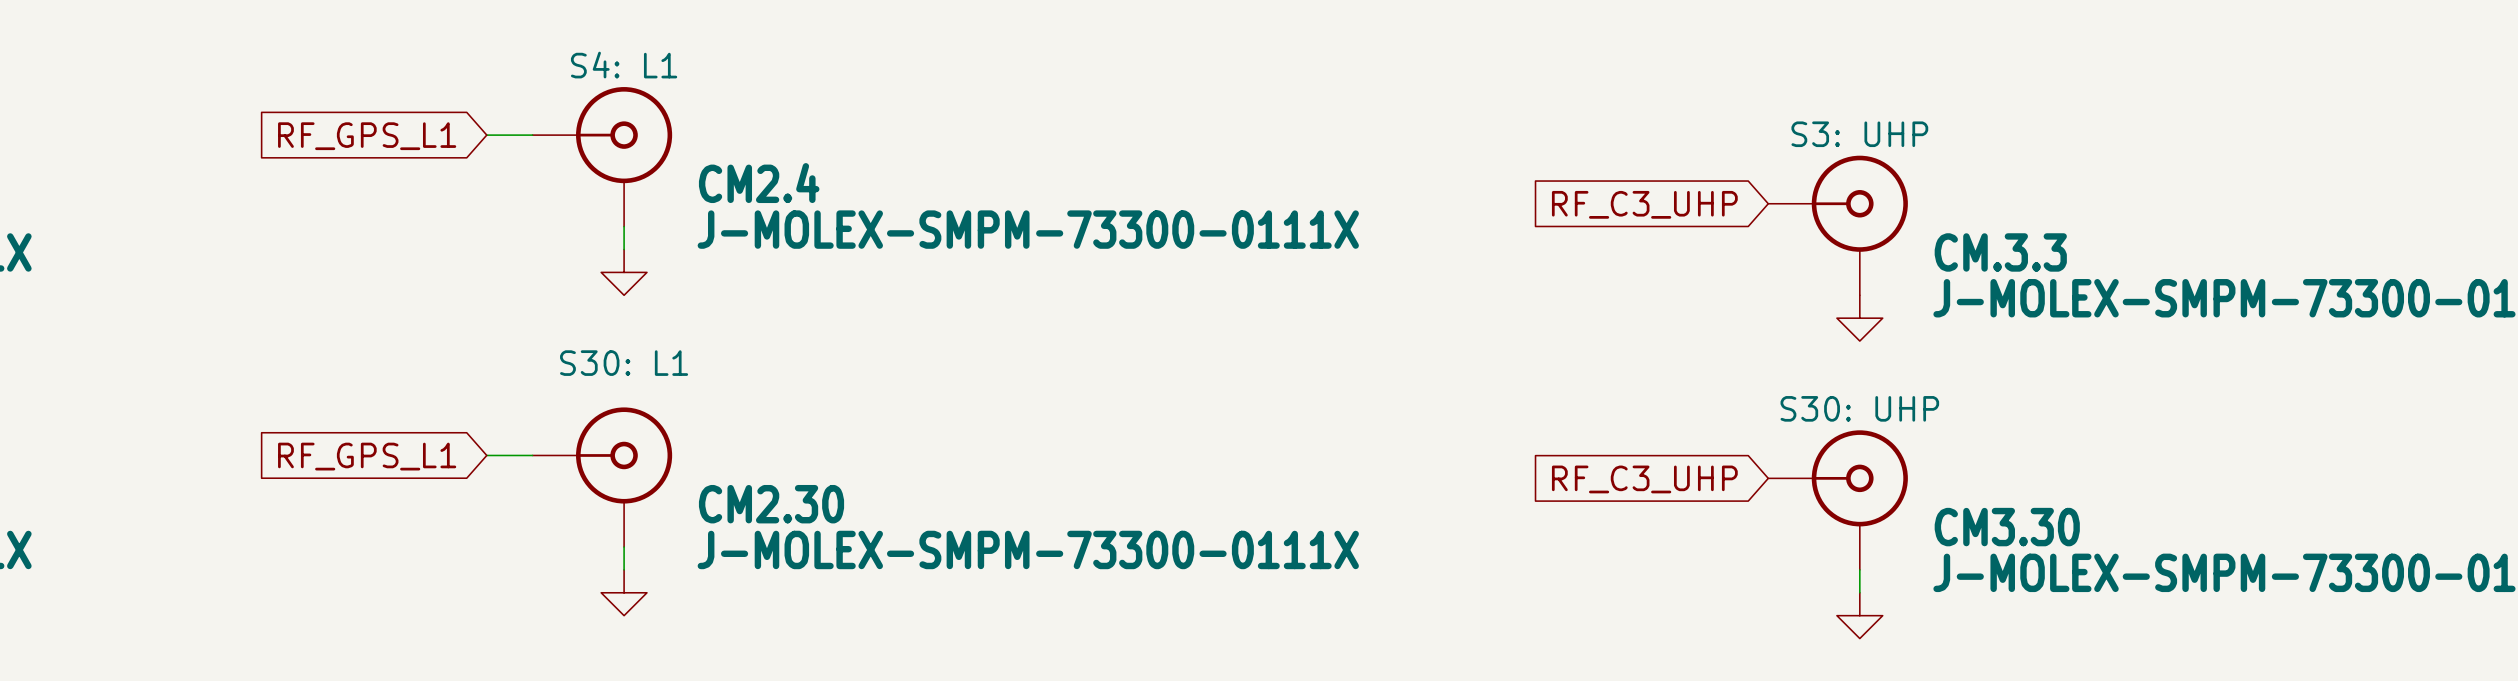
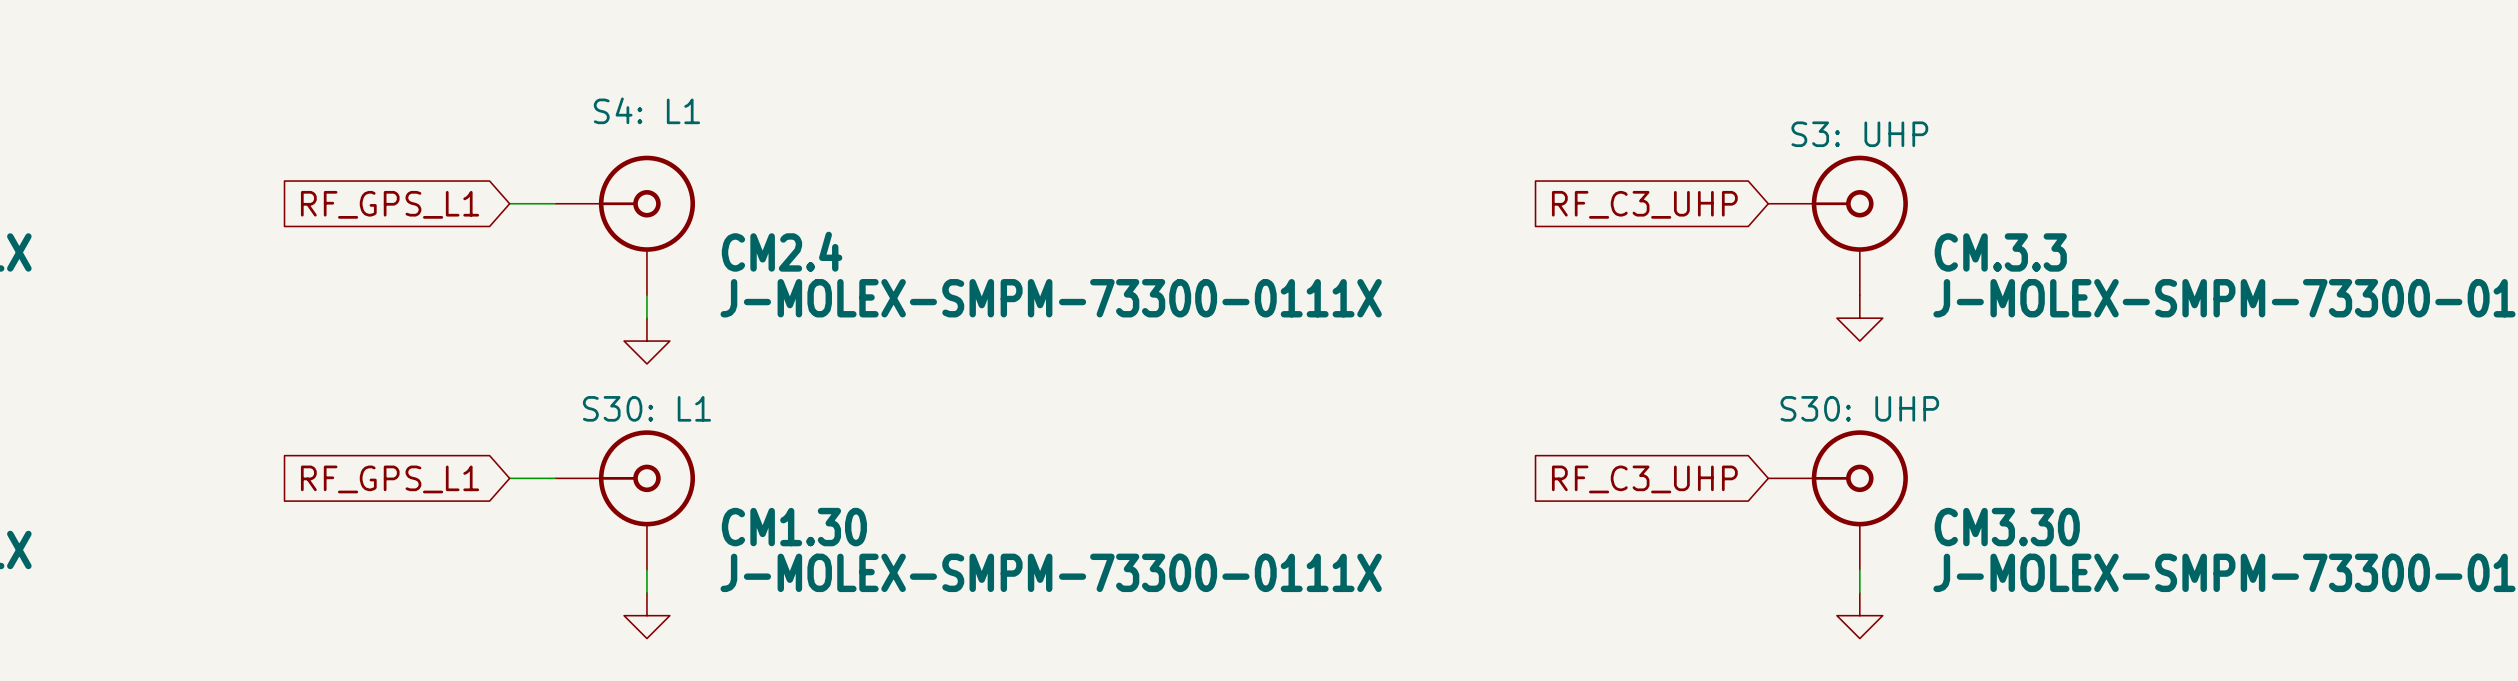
CM2.4 text position: S4: L1 (624, 65) -> S4: L1 (646, 110)
wire: (486, 135) (532, 135) -> (509, 203) (555, 203)
global label position: RF_GPS_L1 (367, 136) -> RF_GPS_L1 (390, 204)
CM2.4 position: (602, 156) -> (625, 225)
wire: (624, 226) (624, 249) -> (646, 295) (646, 318)
power symbol position: (624, 272) -> (646, 341)
wire: (486, 455) (532, 455) -> (509, 478) (555, 478)
global label position: RF_GPS_L1 (367, 456) -> RF_GPS_L1 (390, 479)
CM2.30: J-MOLEX-SMPM-73300-0111X (602, 477) -> none
CM1.30: none -> J-MOLEX-SMPM-73300-0111X (625, 500)
wire: (624, 547) (624, 569) -> (646, 569) (646, 592)
power symbol position: (624, 592) -> (646, 615)

